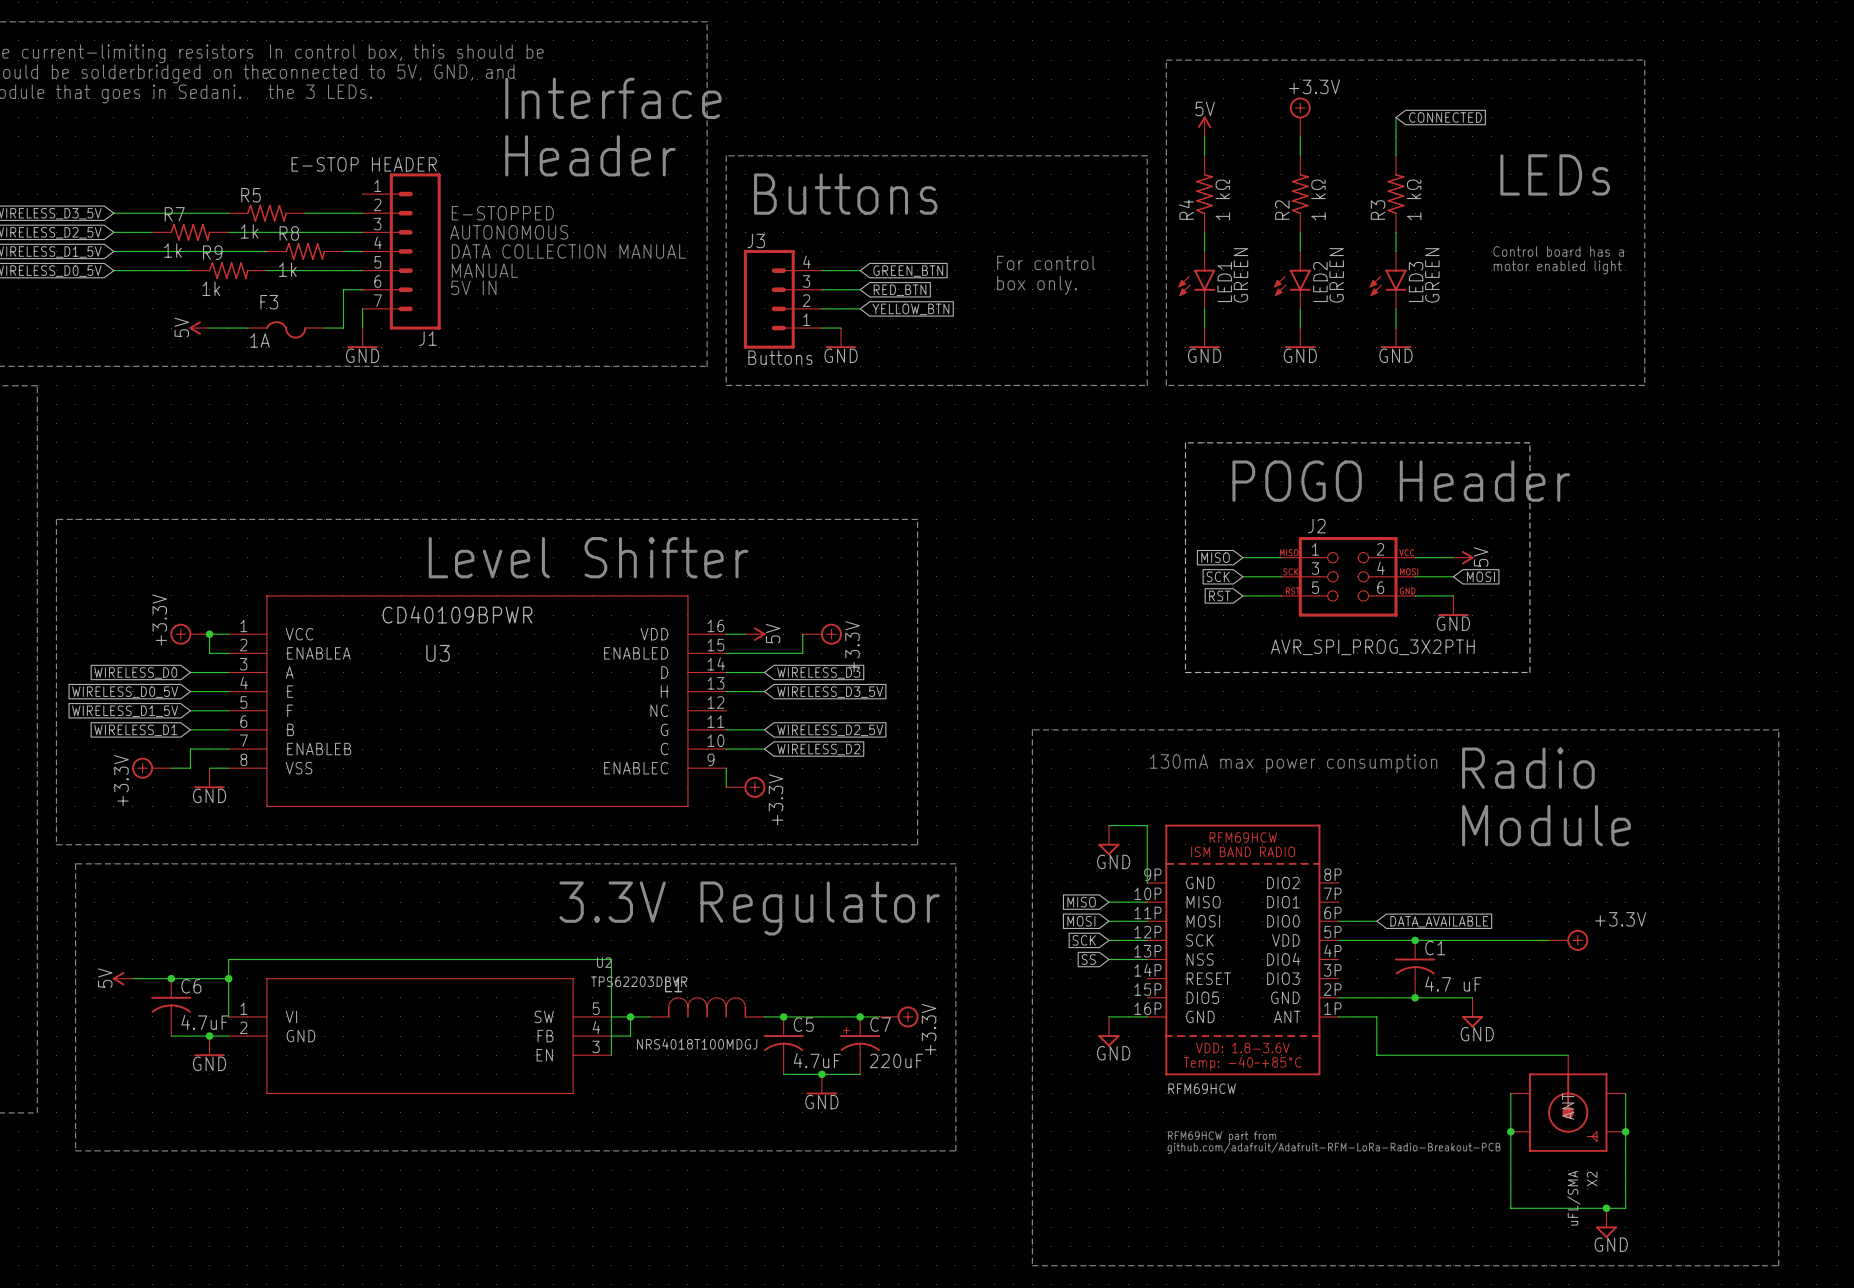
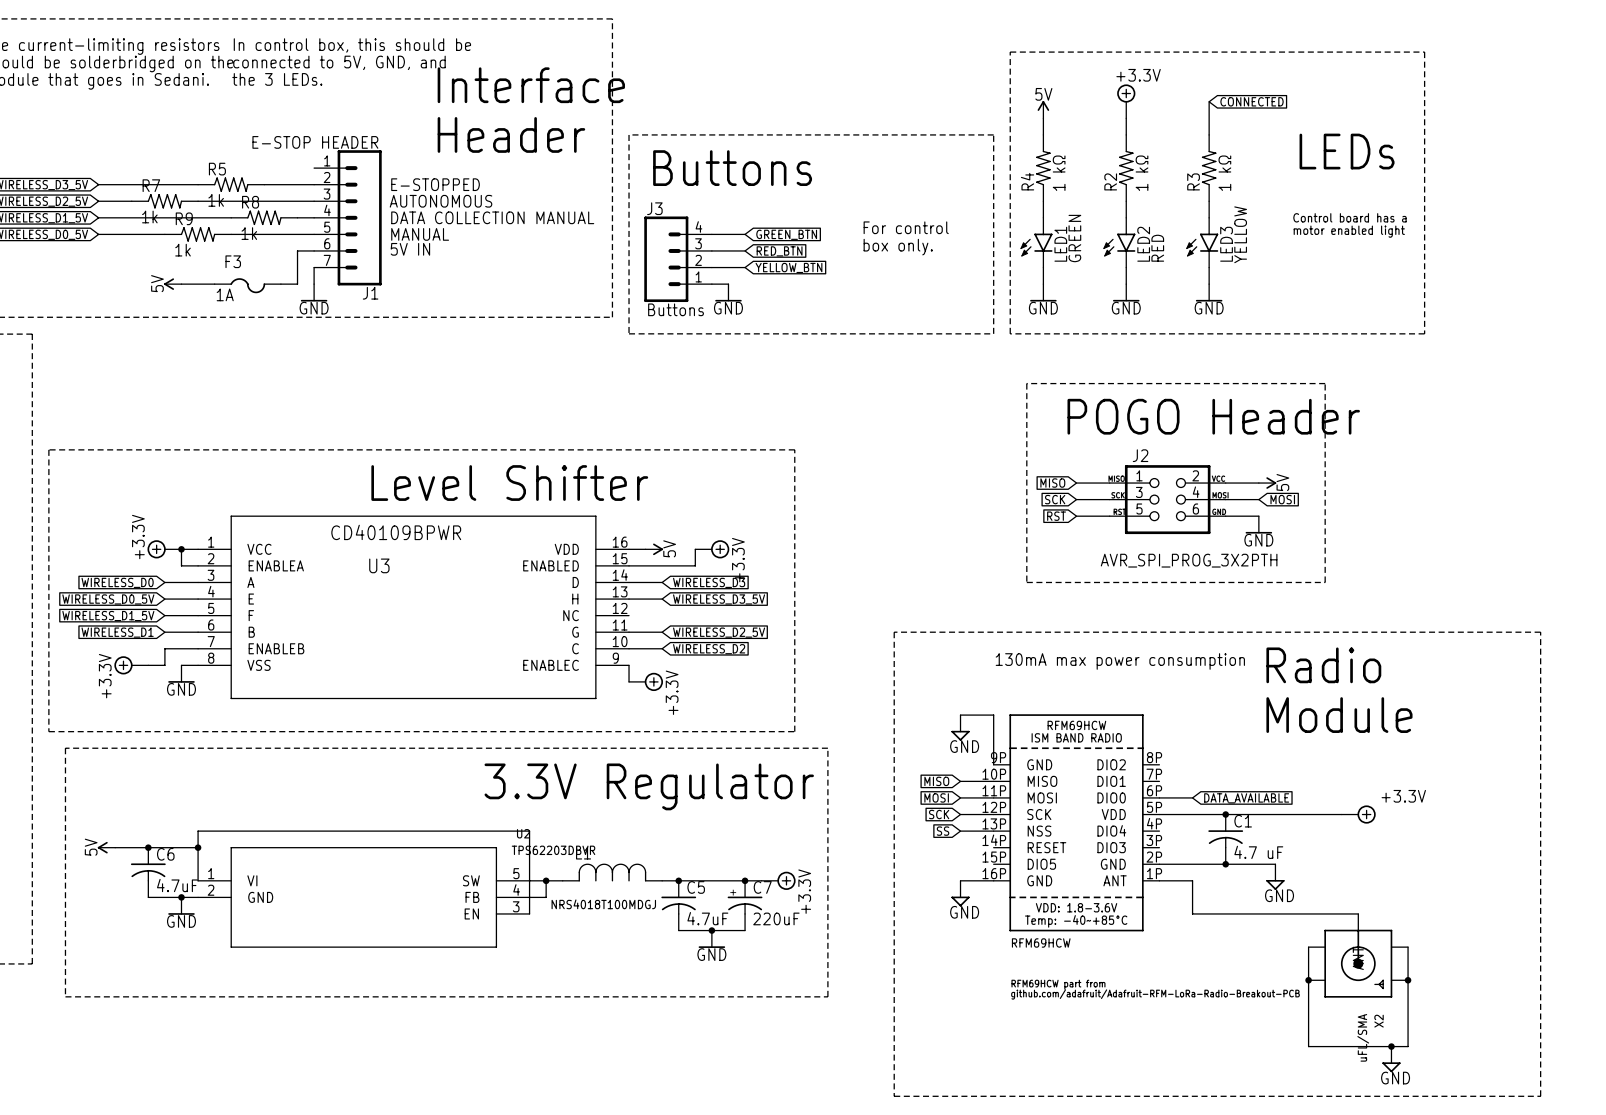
LED2 value: GREEN (1336, 275) -> RED (1157, 248)
LED3 value: GREEN (1432, 275) -> YELLOW (1240, 234)

